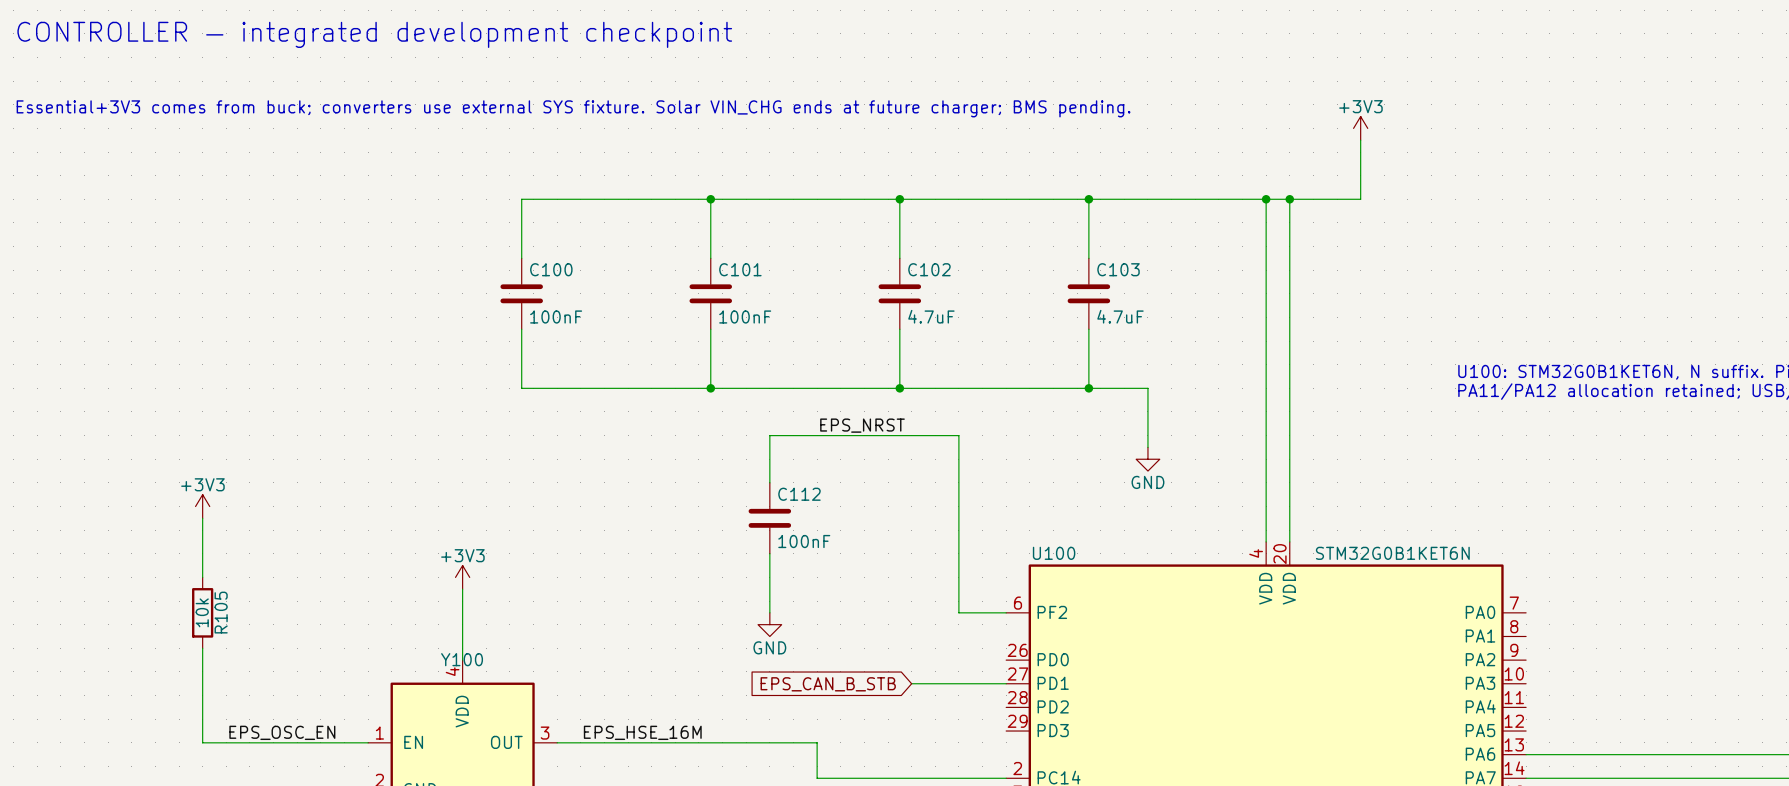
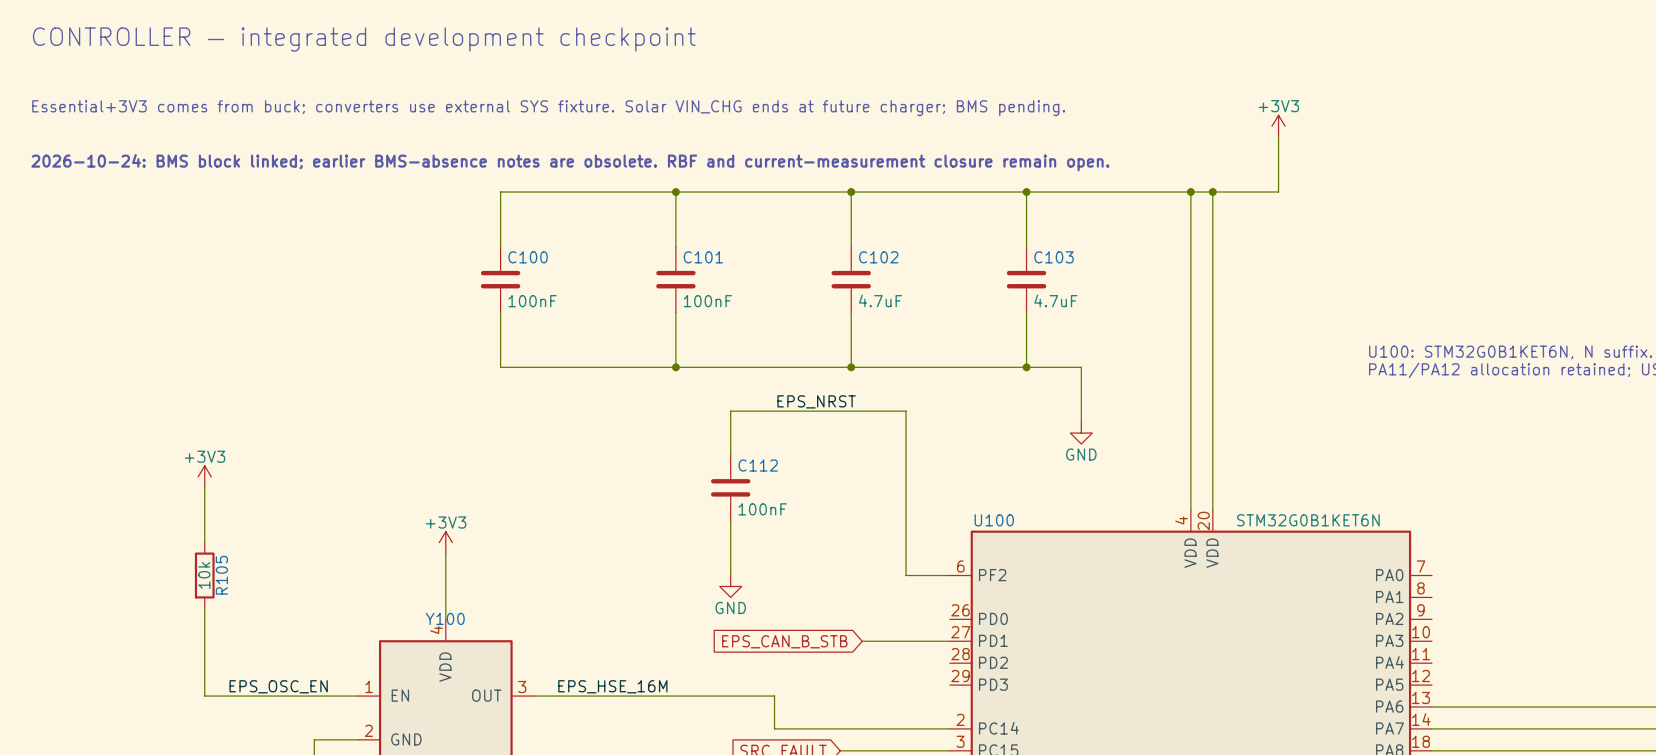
text: none -> 2026-10-24: BMS block linked; earlier BMS-absence notes are obsolete. RBF and current-measurement closure remain open. (570, 162)

